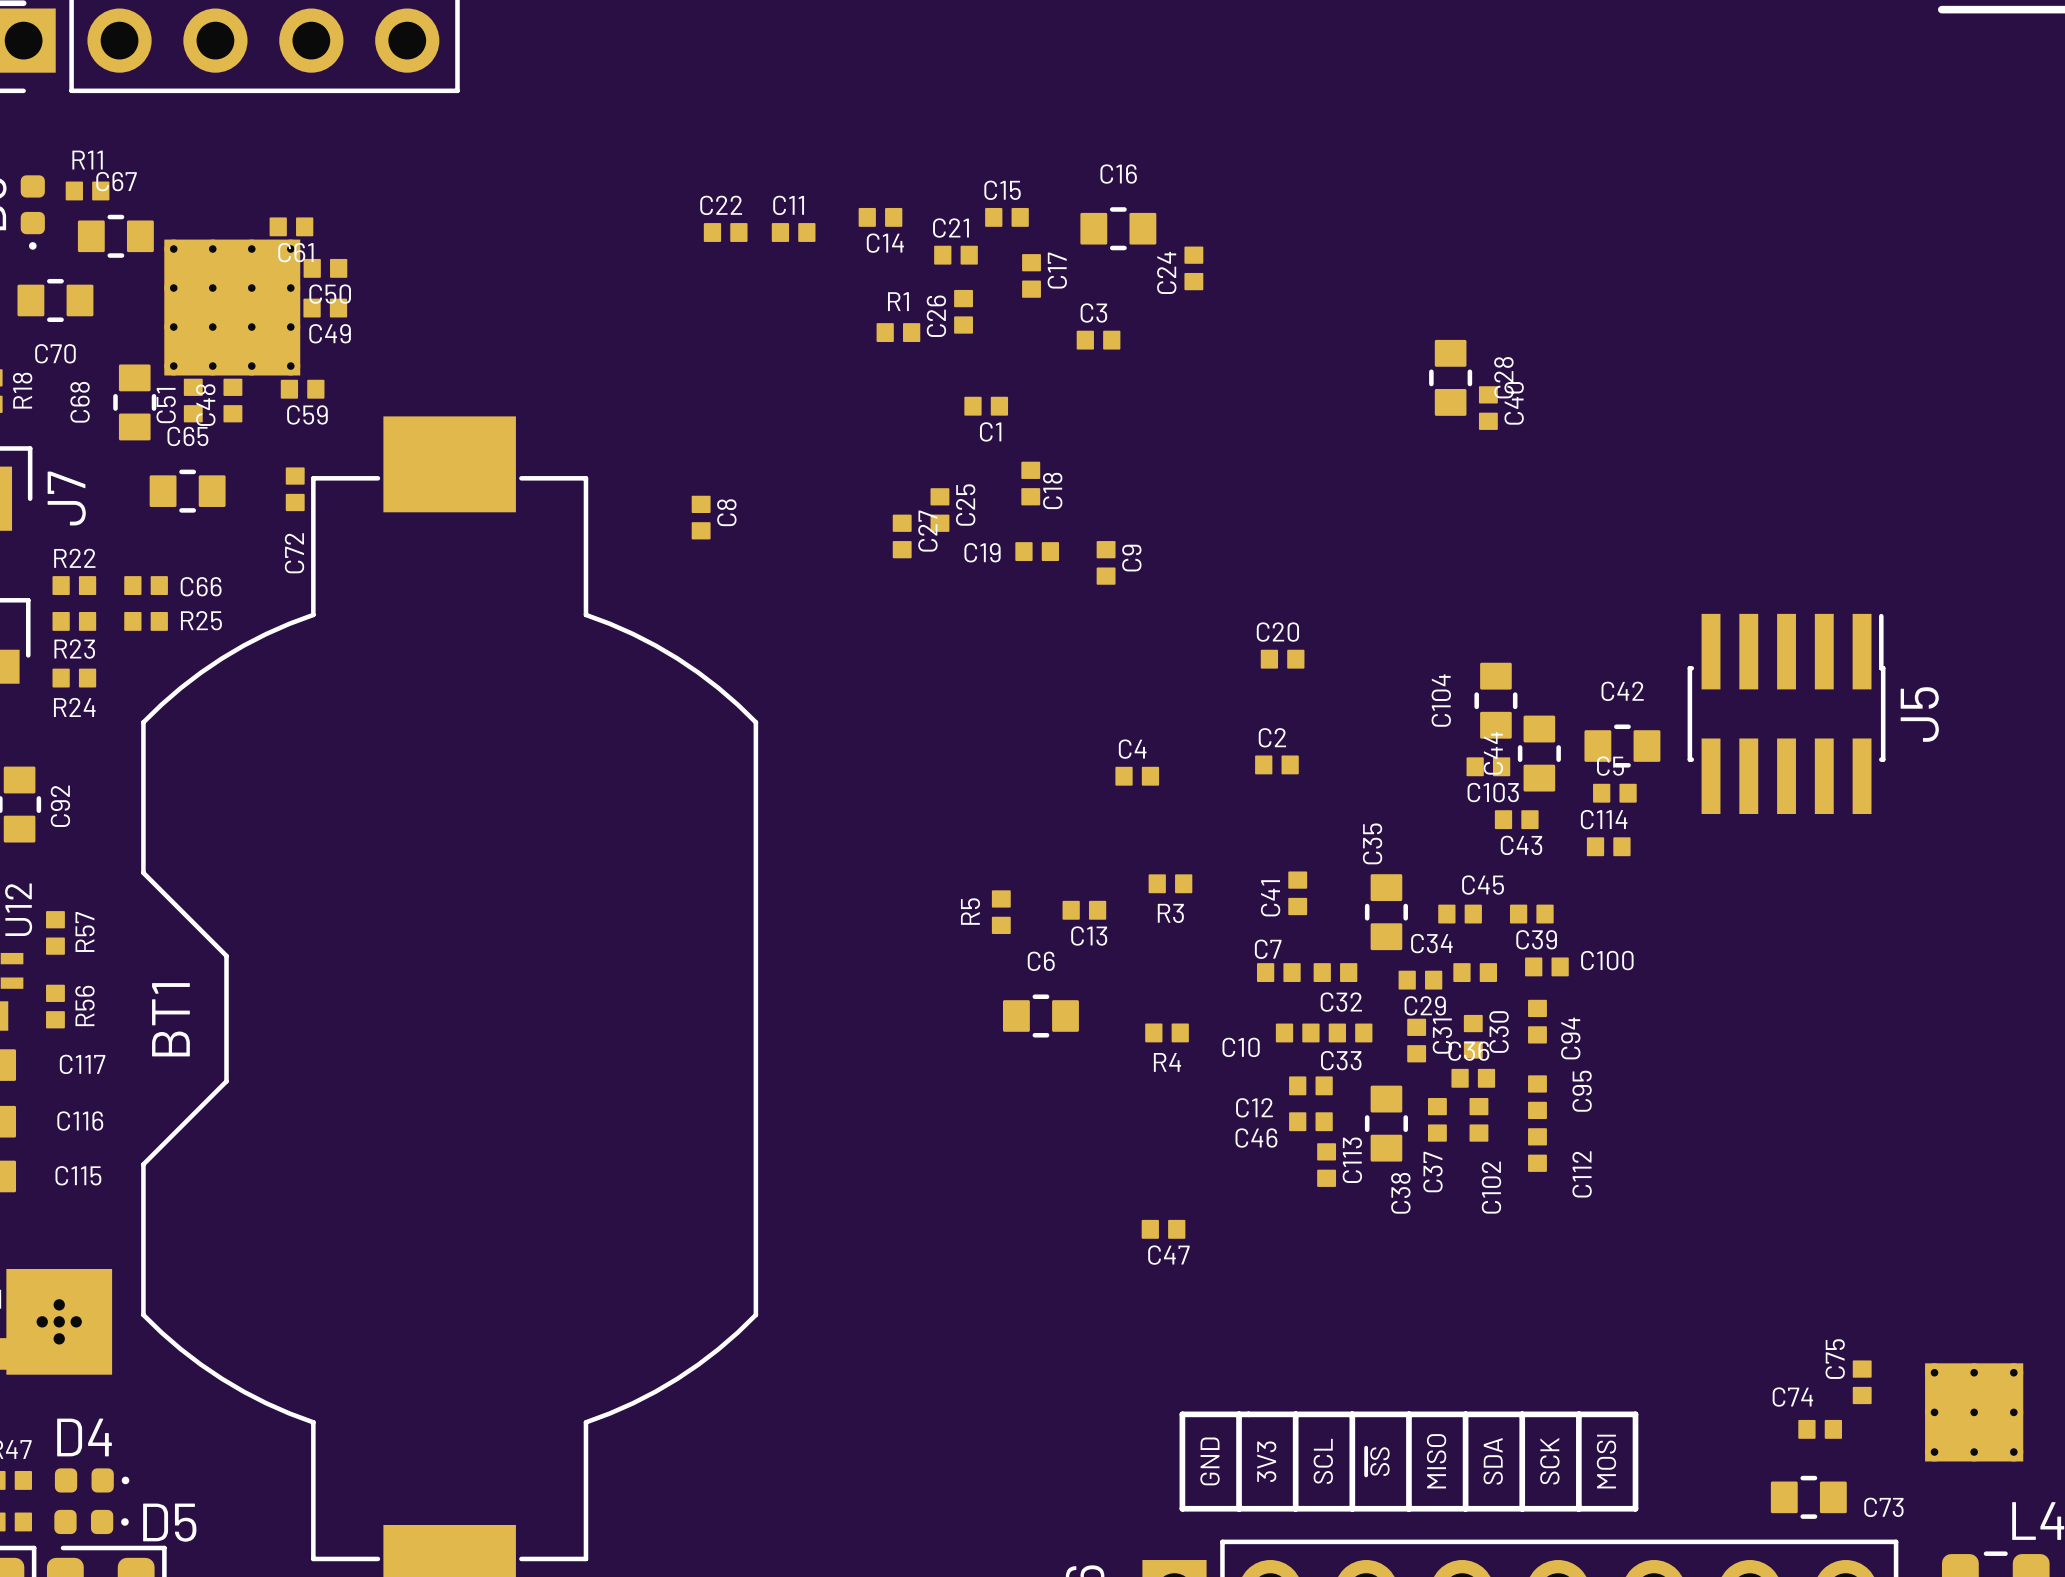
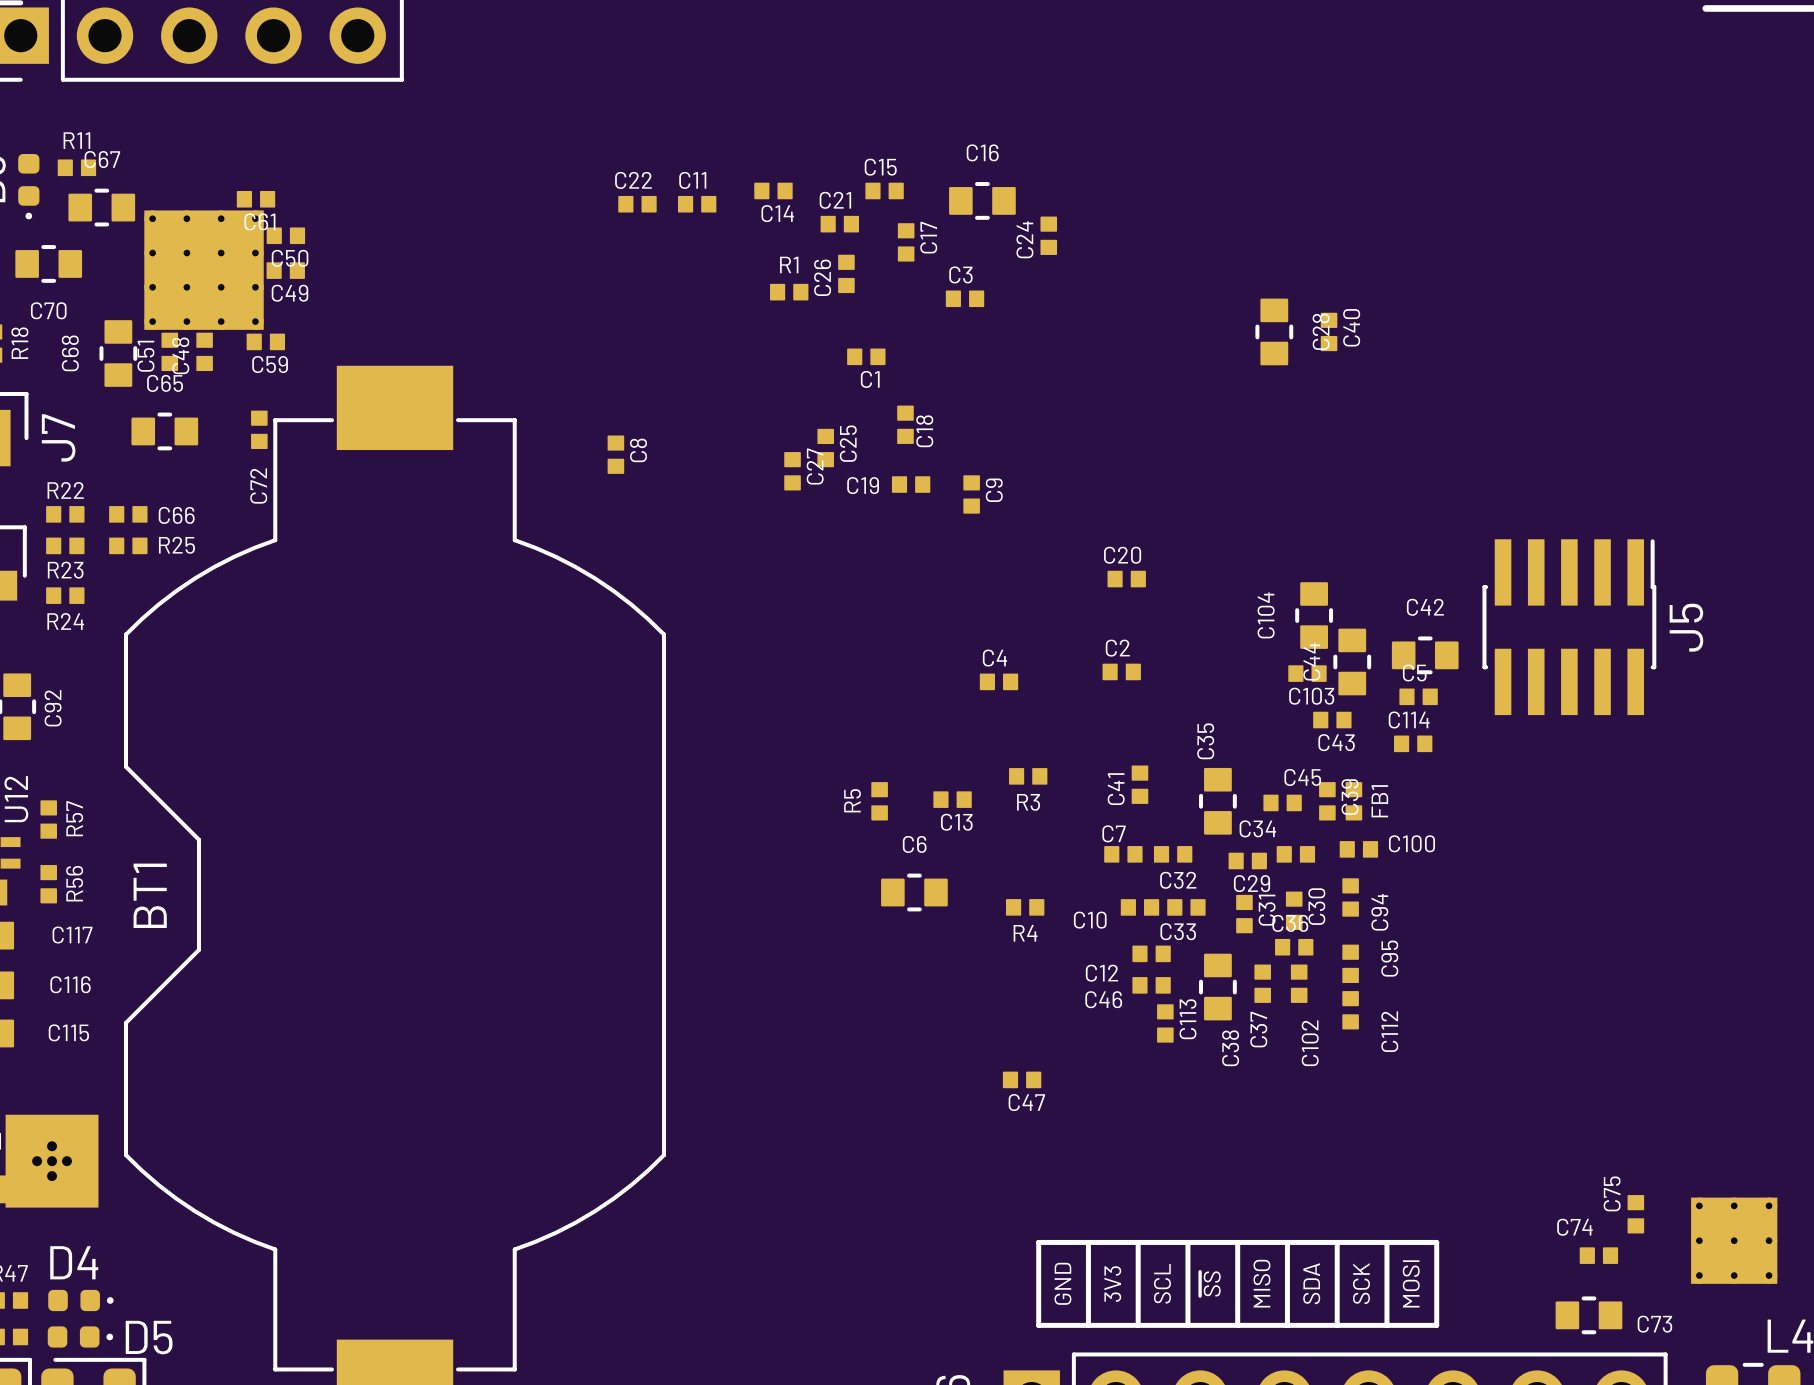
C40 position: (1488, 408) -> (1329, 331)
FB1: none -> (1353, 801)
C39 rotation: 0° (1531, 914) -> 90° clockwise (1327, 801)

